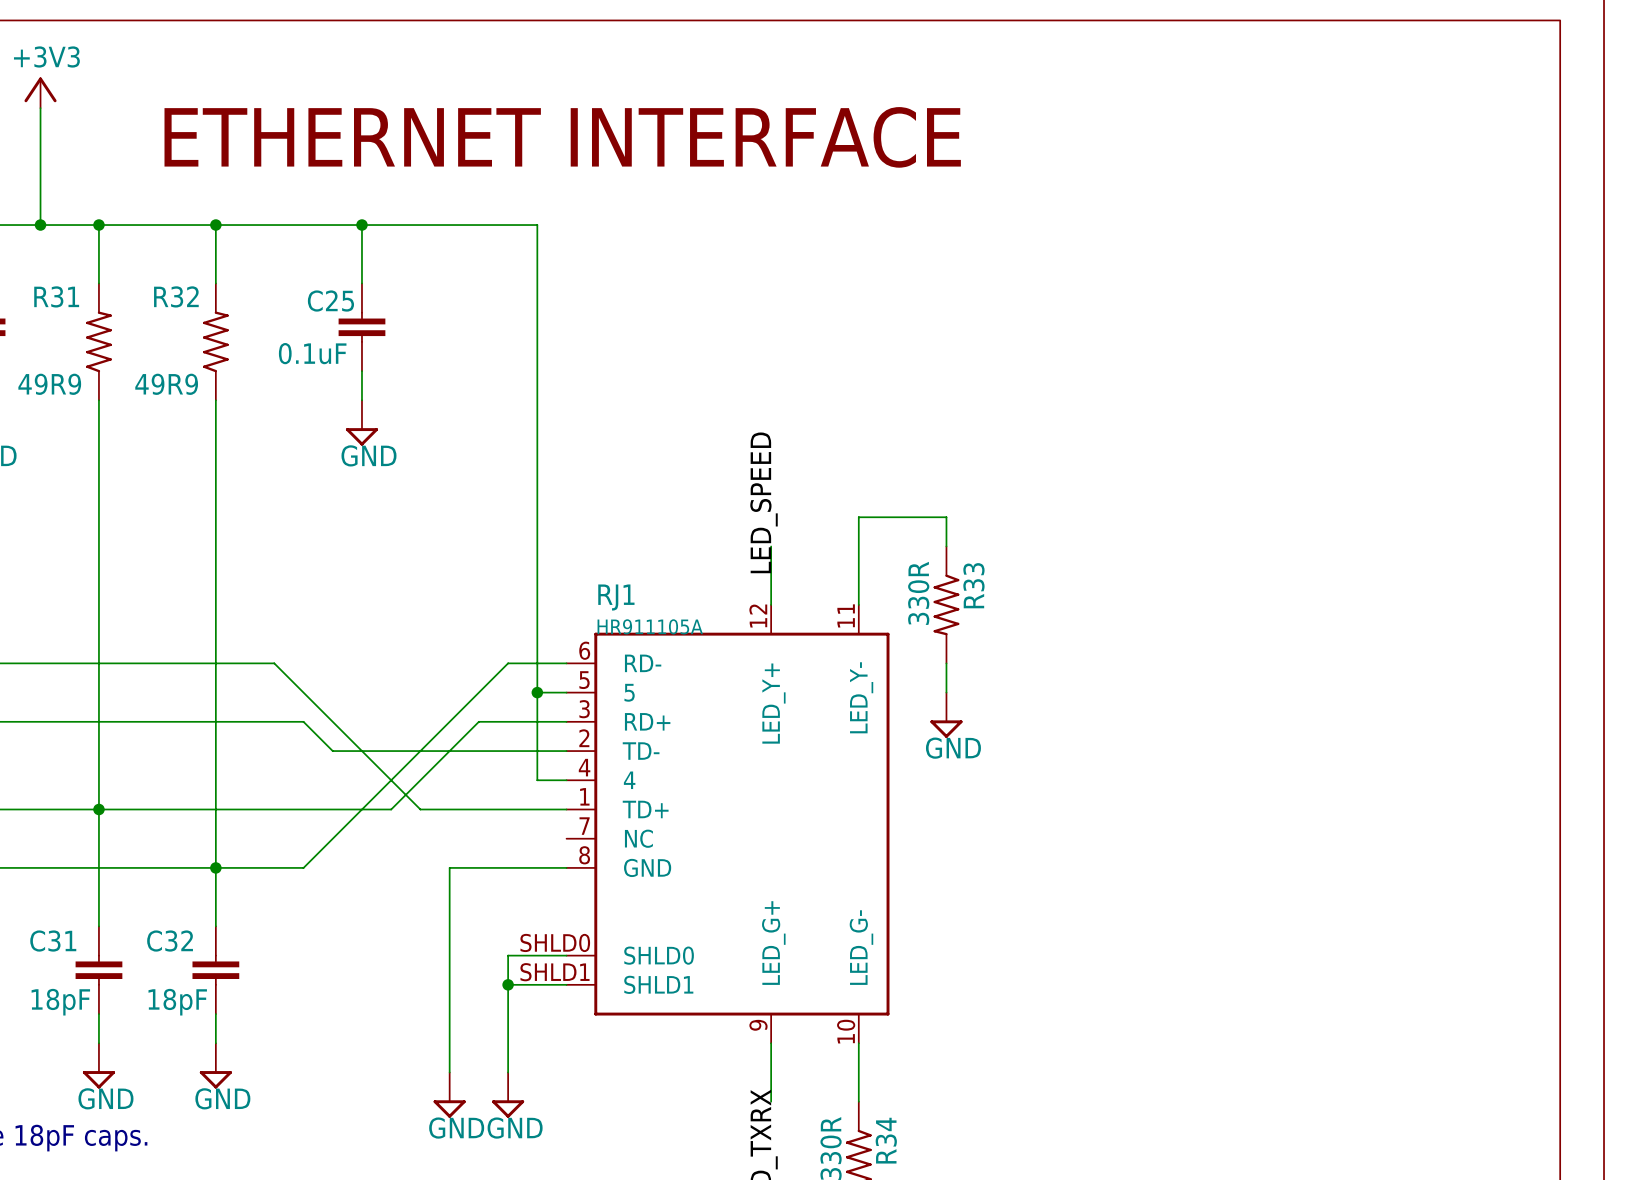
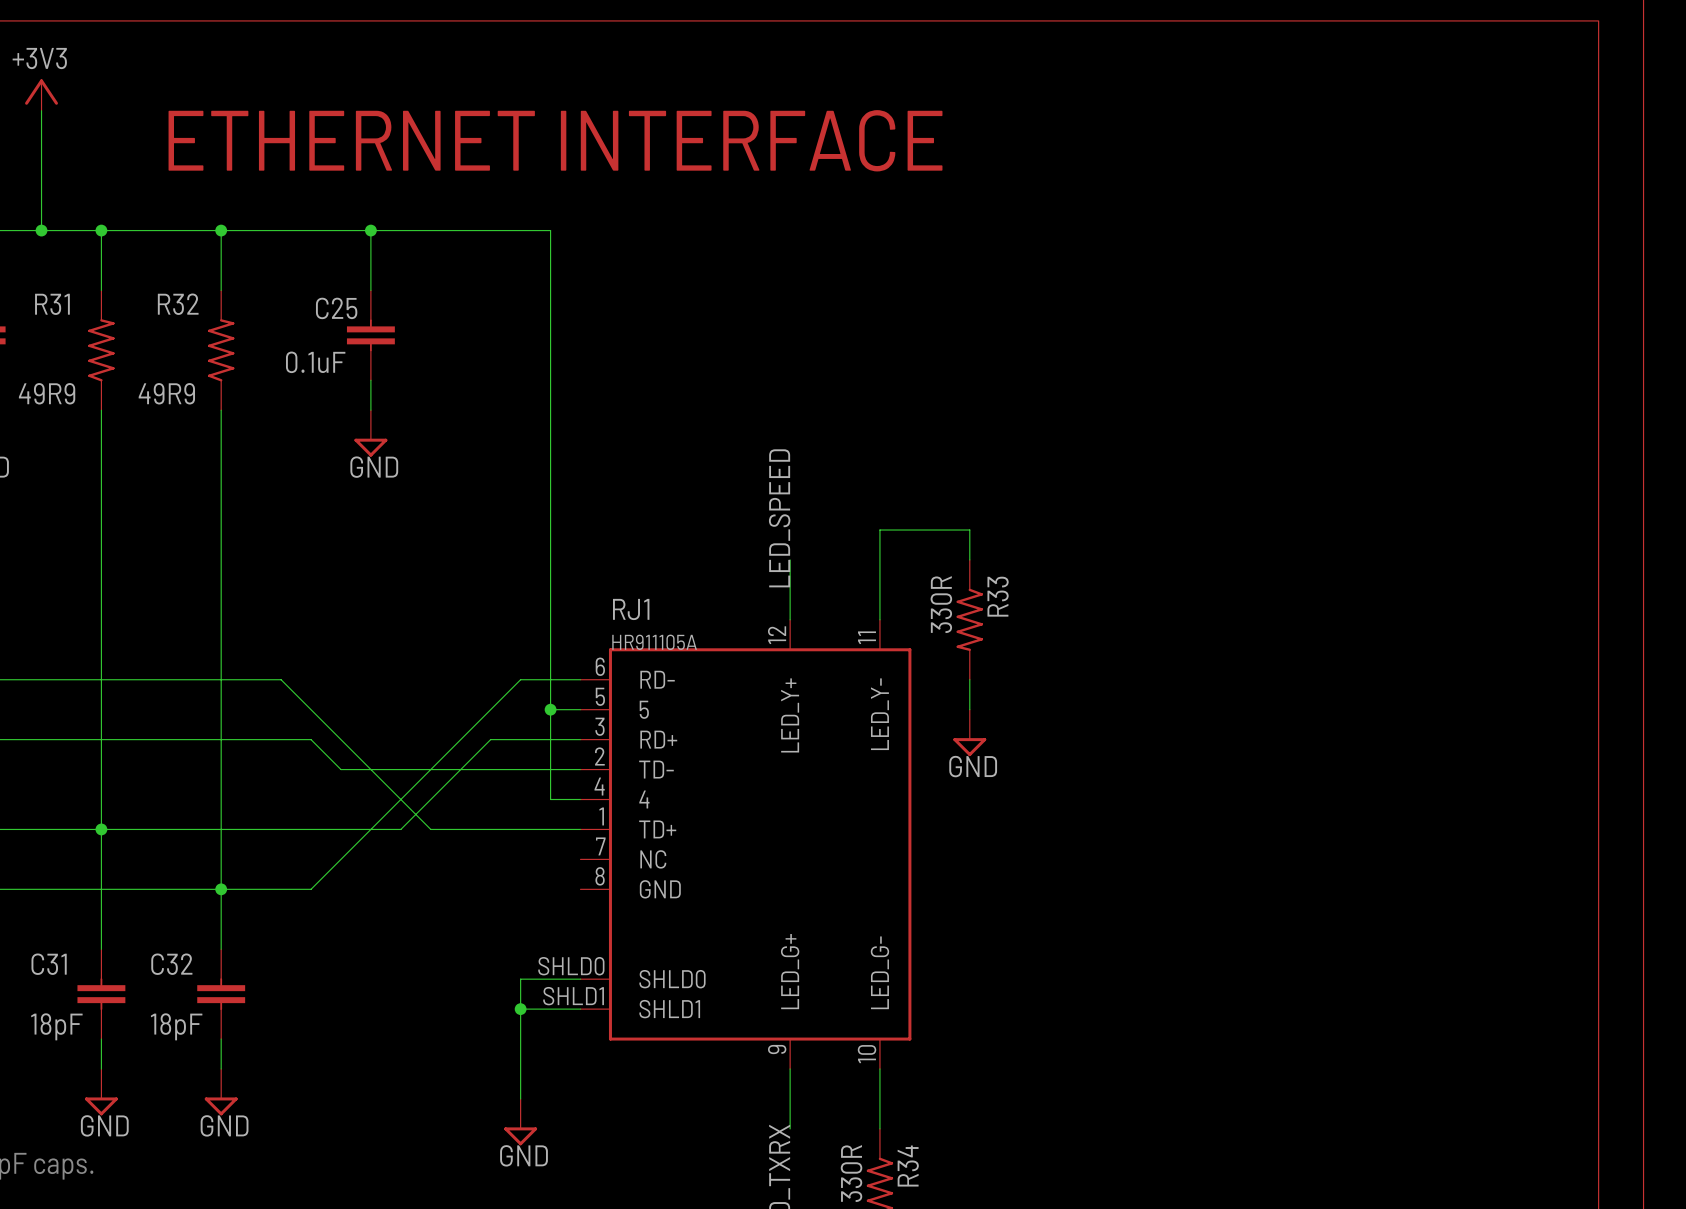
wire: (566, 867) (449, 867) (449, 1072) -> none
power symbol: GND (449, 1095) -> none

